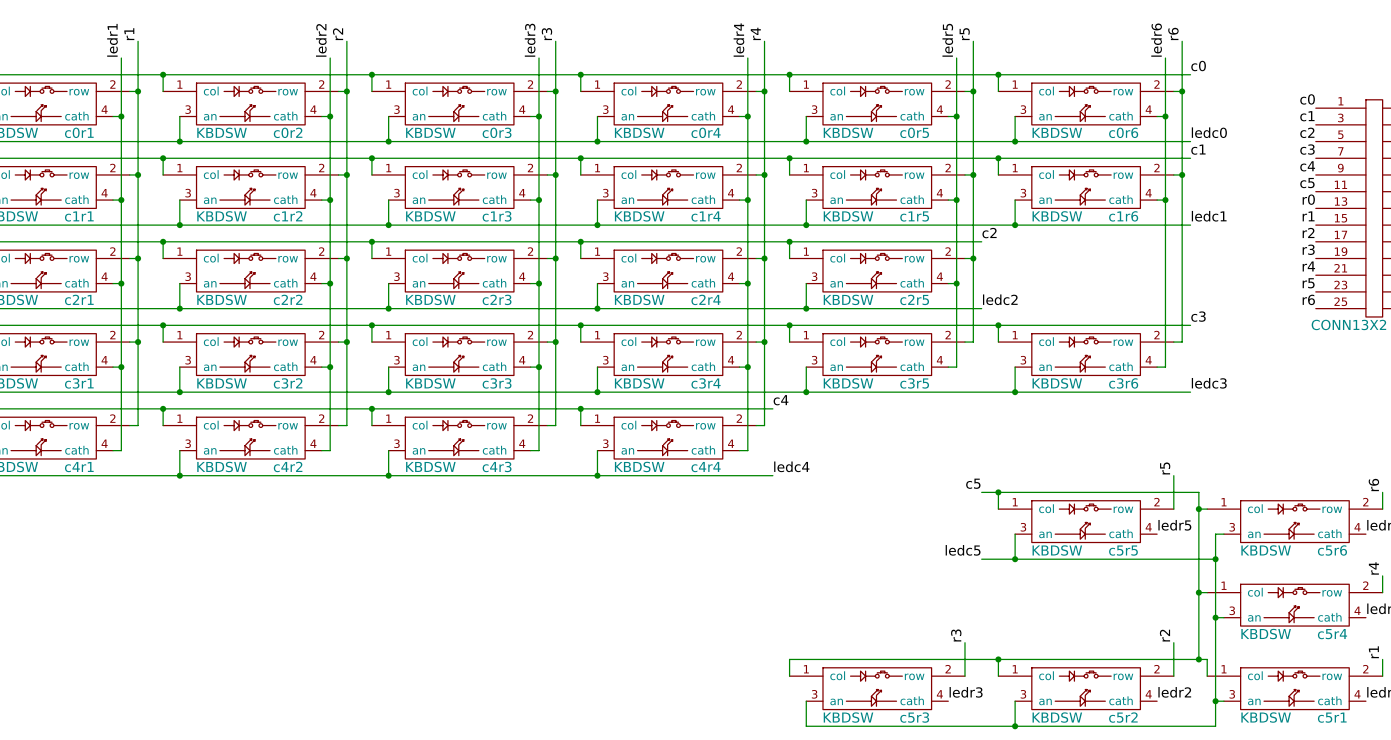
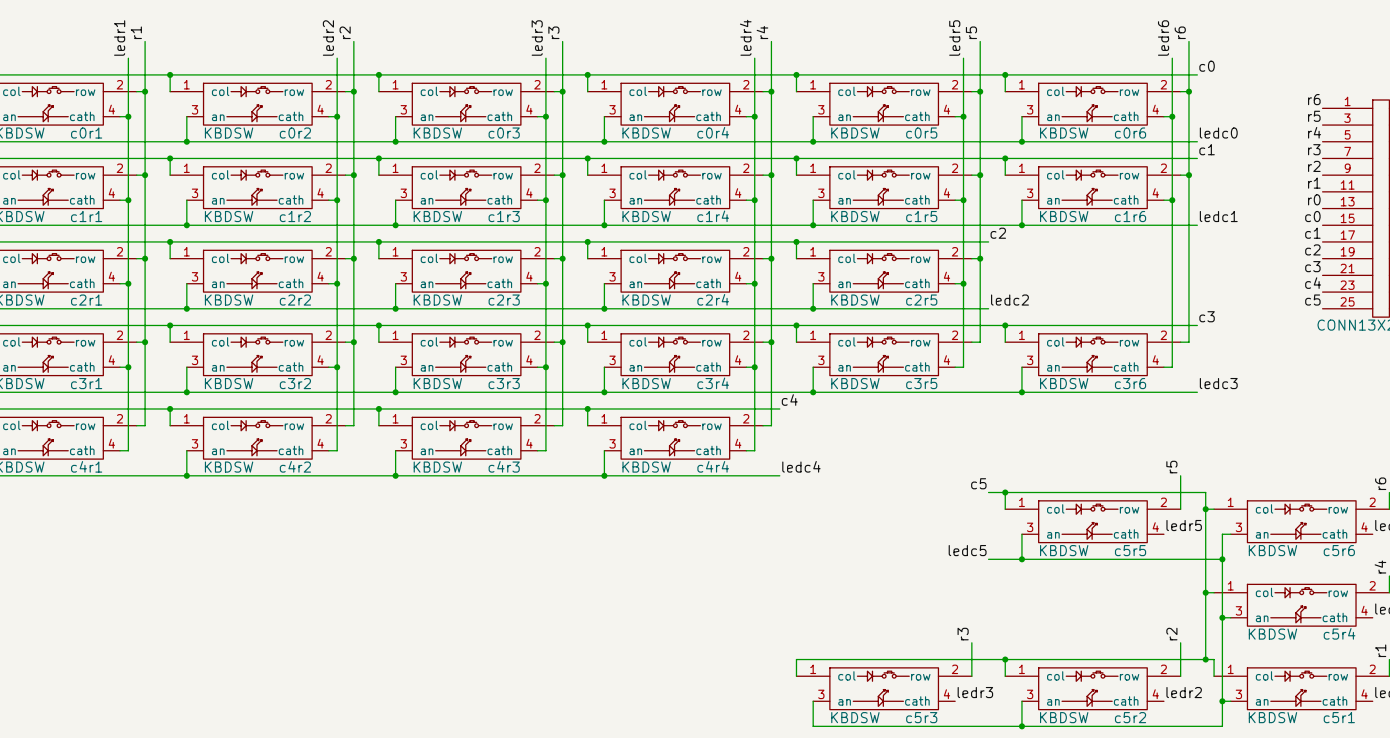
label: c0 (1307, 99) -> r6 (1314, 99)
label: c1 (1307, 116) -> r5 (1314, 116)
label: c2 (1307, 132) -> r4 (1314, 132)
label: c3 (1307, 149) -> r3 (1314, 149)
label: c4 (1307, 166) -> r2 (1314, 166)
label: c5 (1307, 183) -> r1 (1314, 183)
label: r1 (1308, 216) -> c0 (1312, 216)
label: r2 (1308, 232) -> c1 (1312, 233)
label: r3 (1308, 249) -> c2 (1312, 249)
label: r4 (1308, 266) -> c3 (1312, 266)
label: r5 (1308, 283) -> c4 (1313, 283)
label: r6 (1308, 299) -> c5 (1312, 300)

